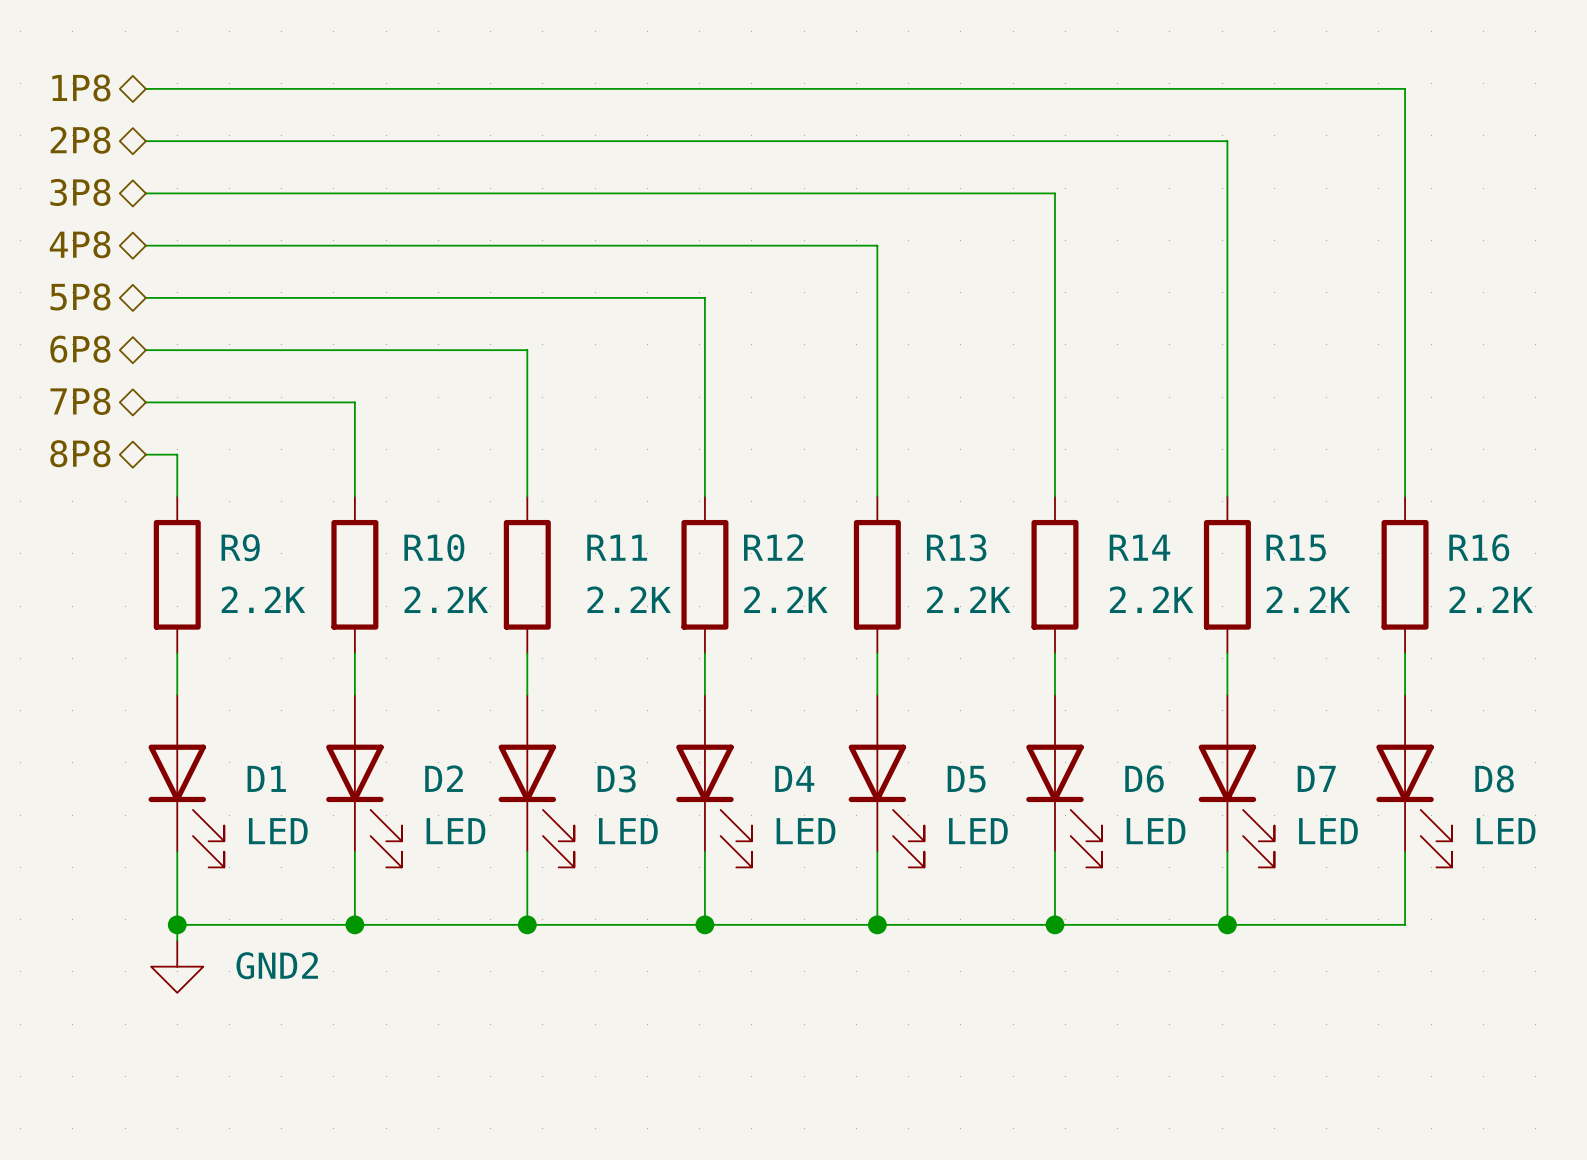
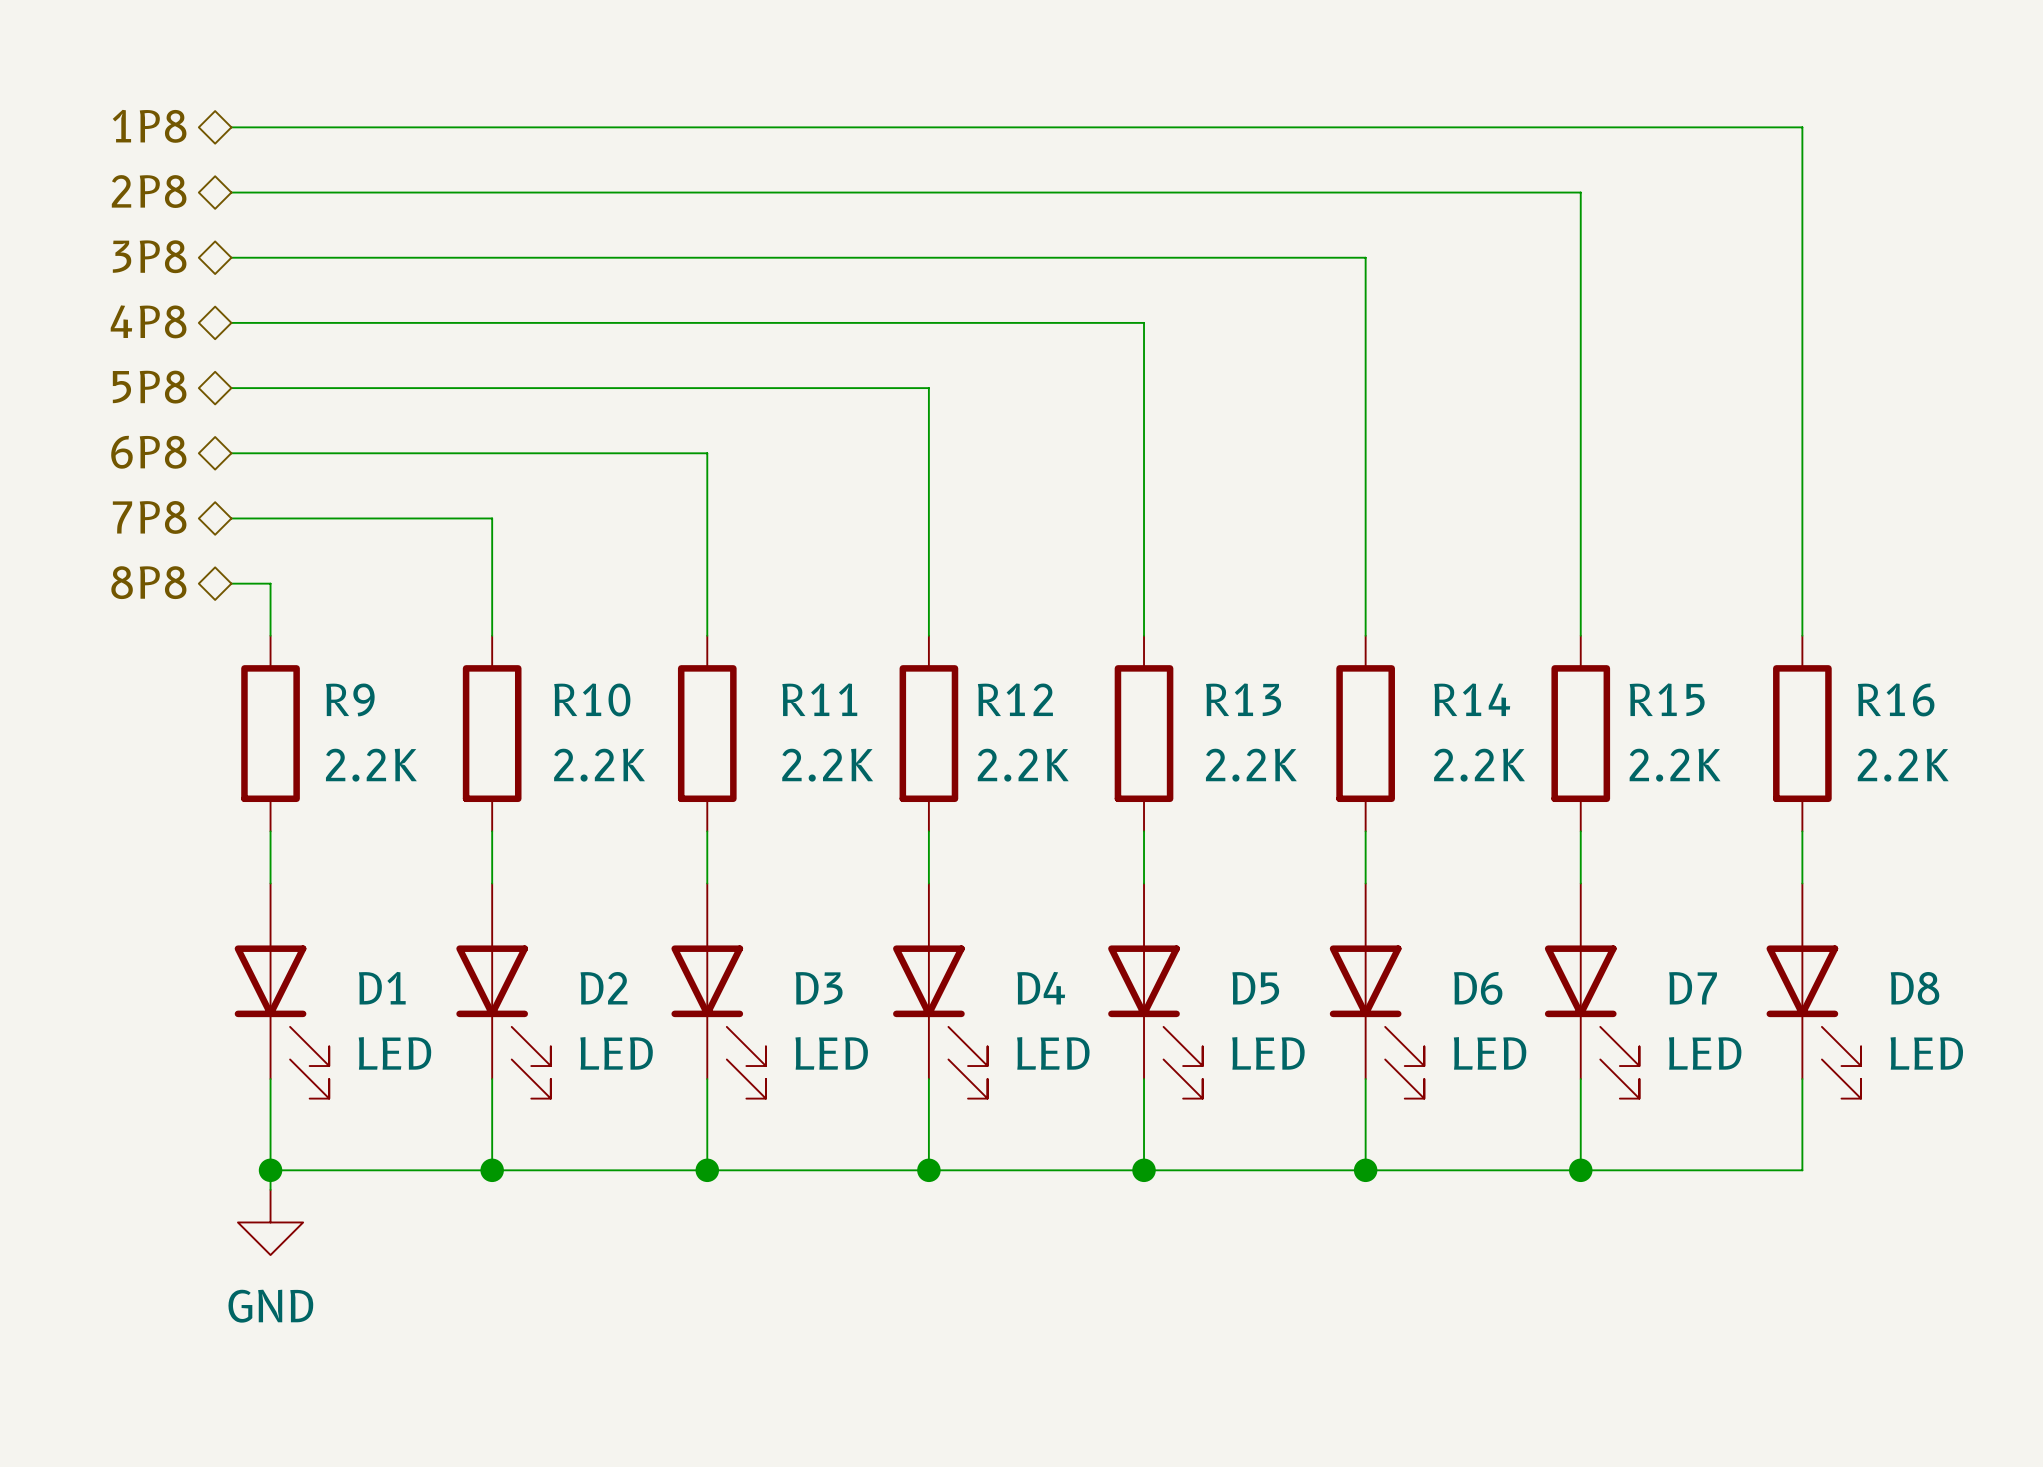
power symbol: GND2 (177, 966) -> GND (270, 1222)

